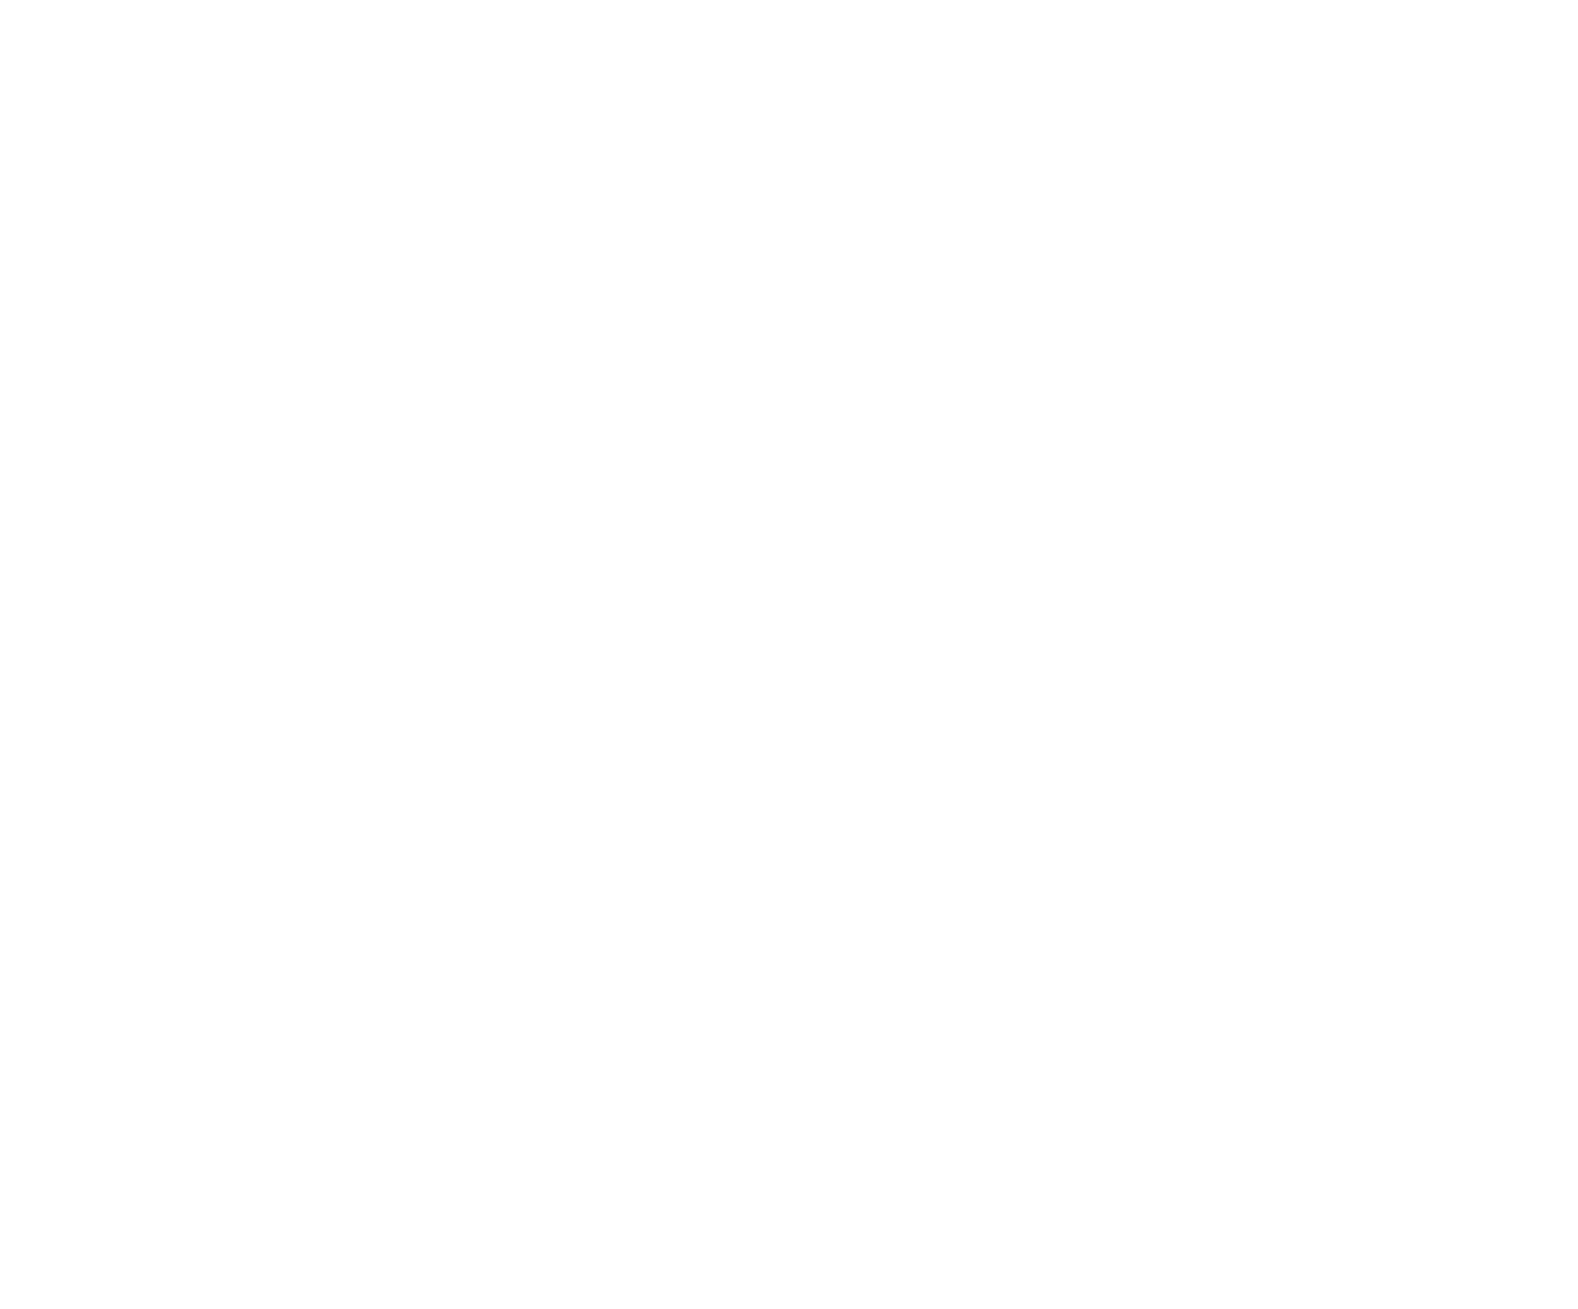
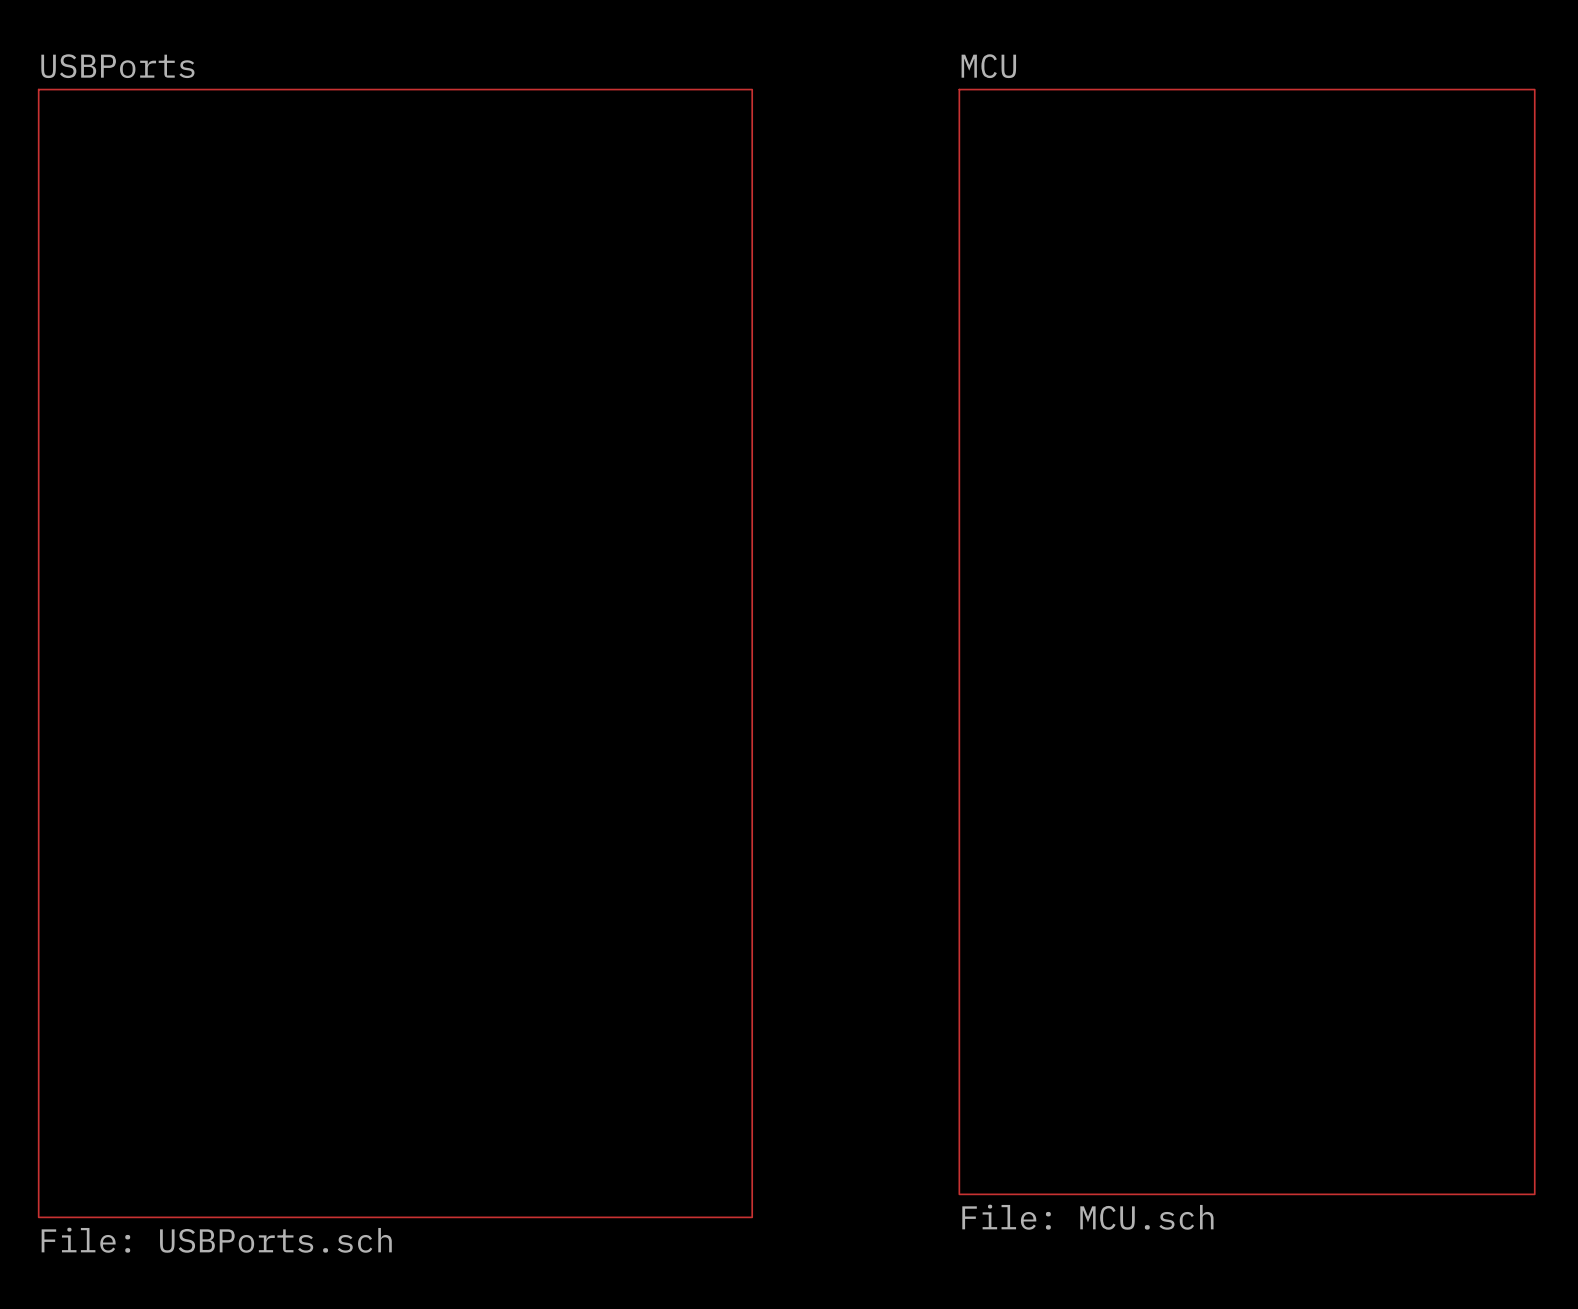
sheet MCU: none -> File: MCU.sch (1247, 641)
sheet USBPorts: none -> File: USBPorts.sch (395, 653)

